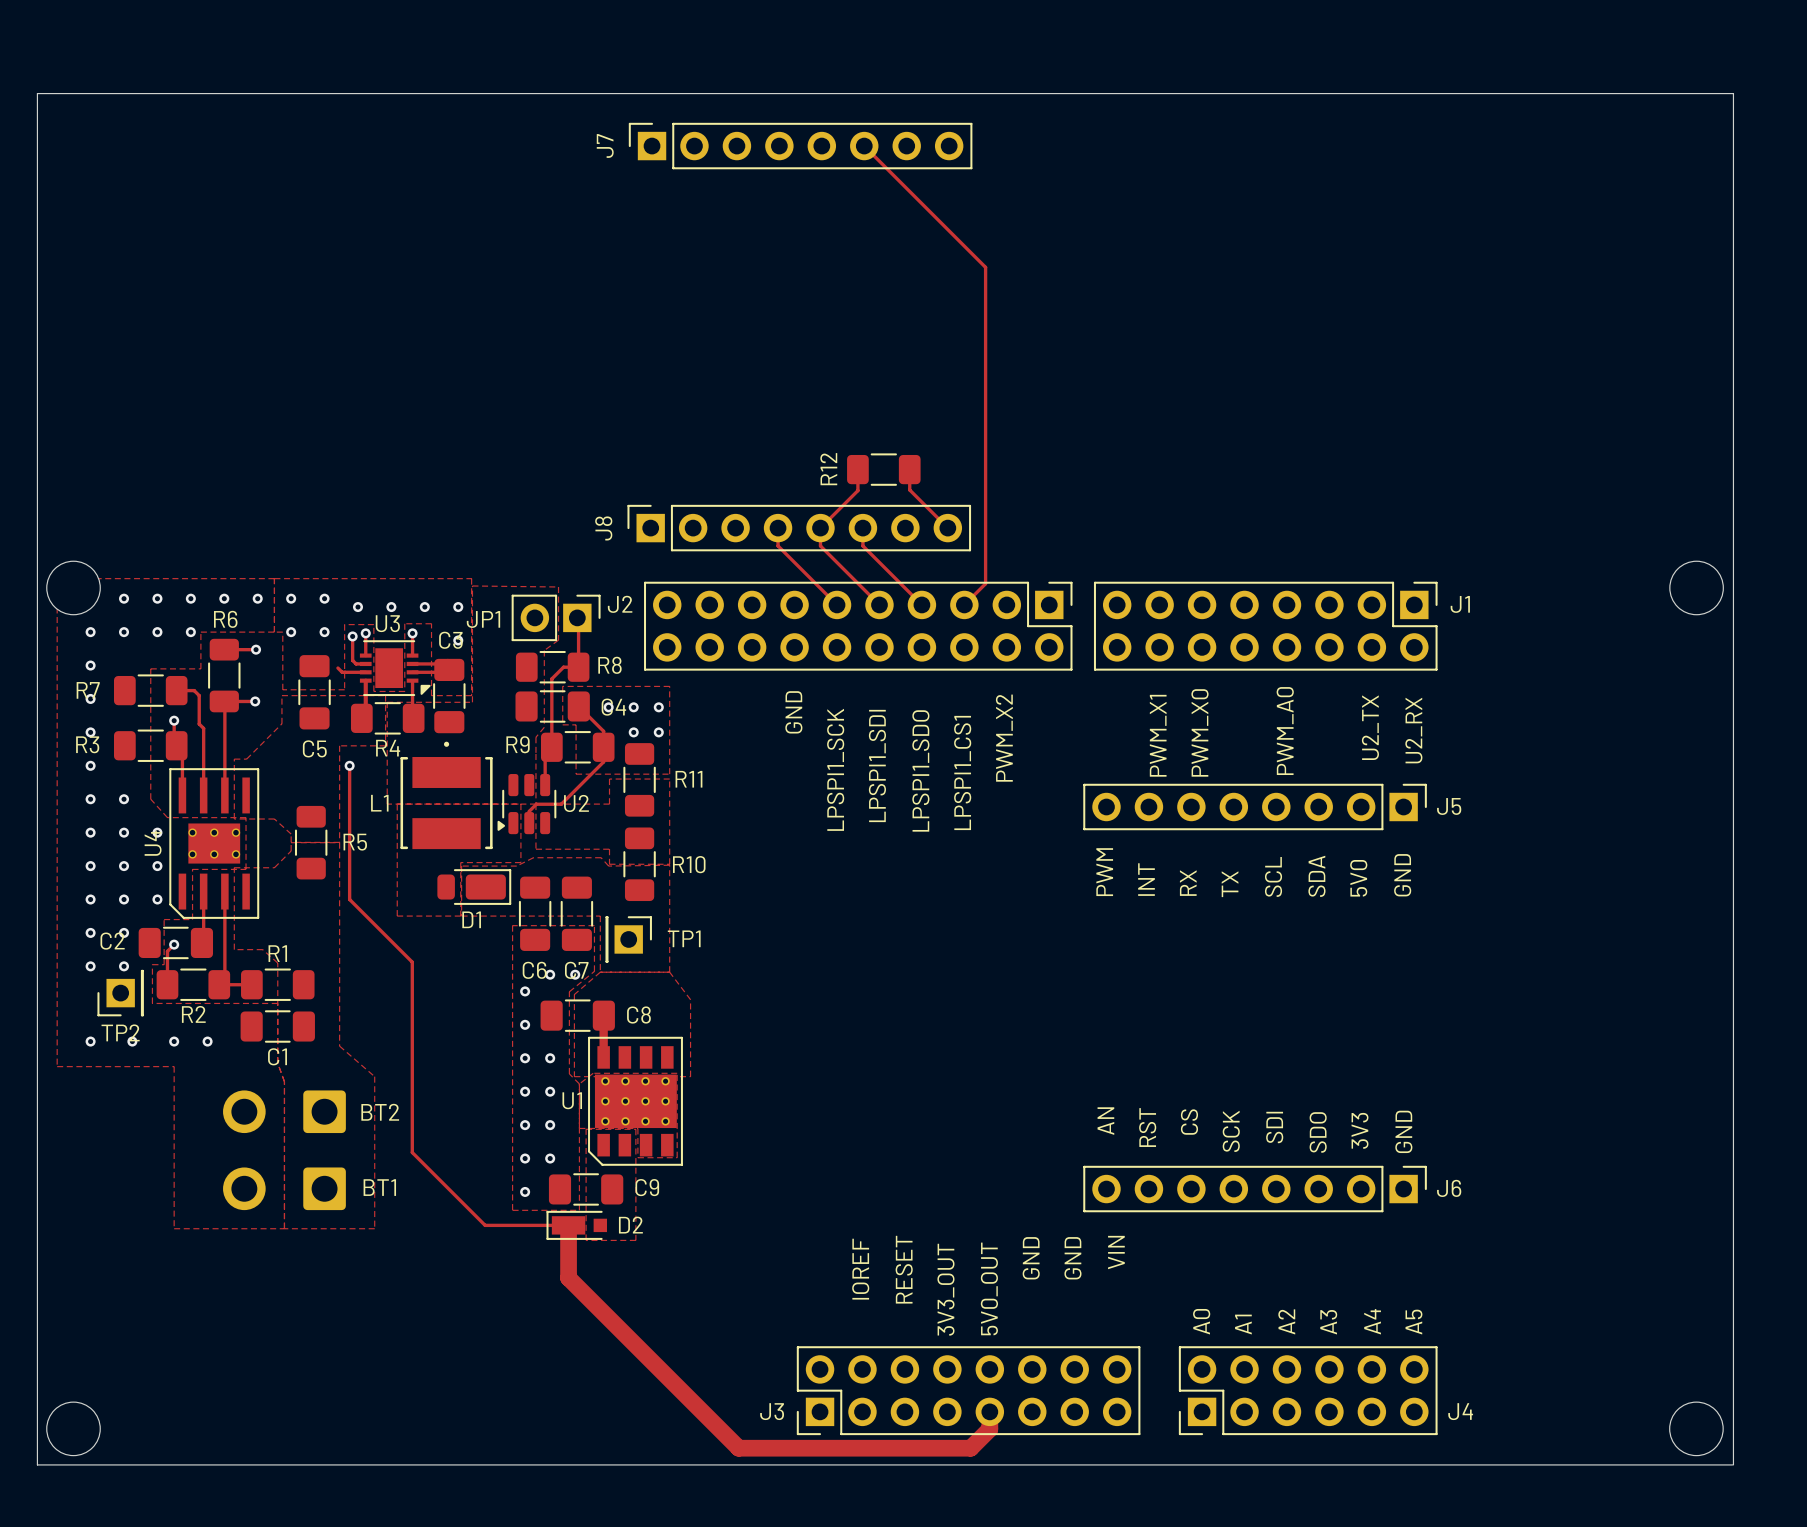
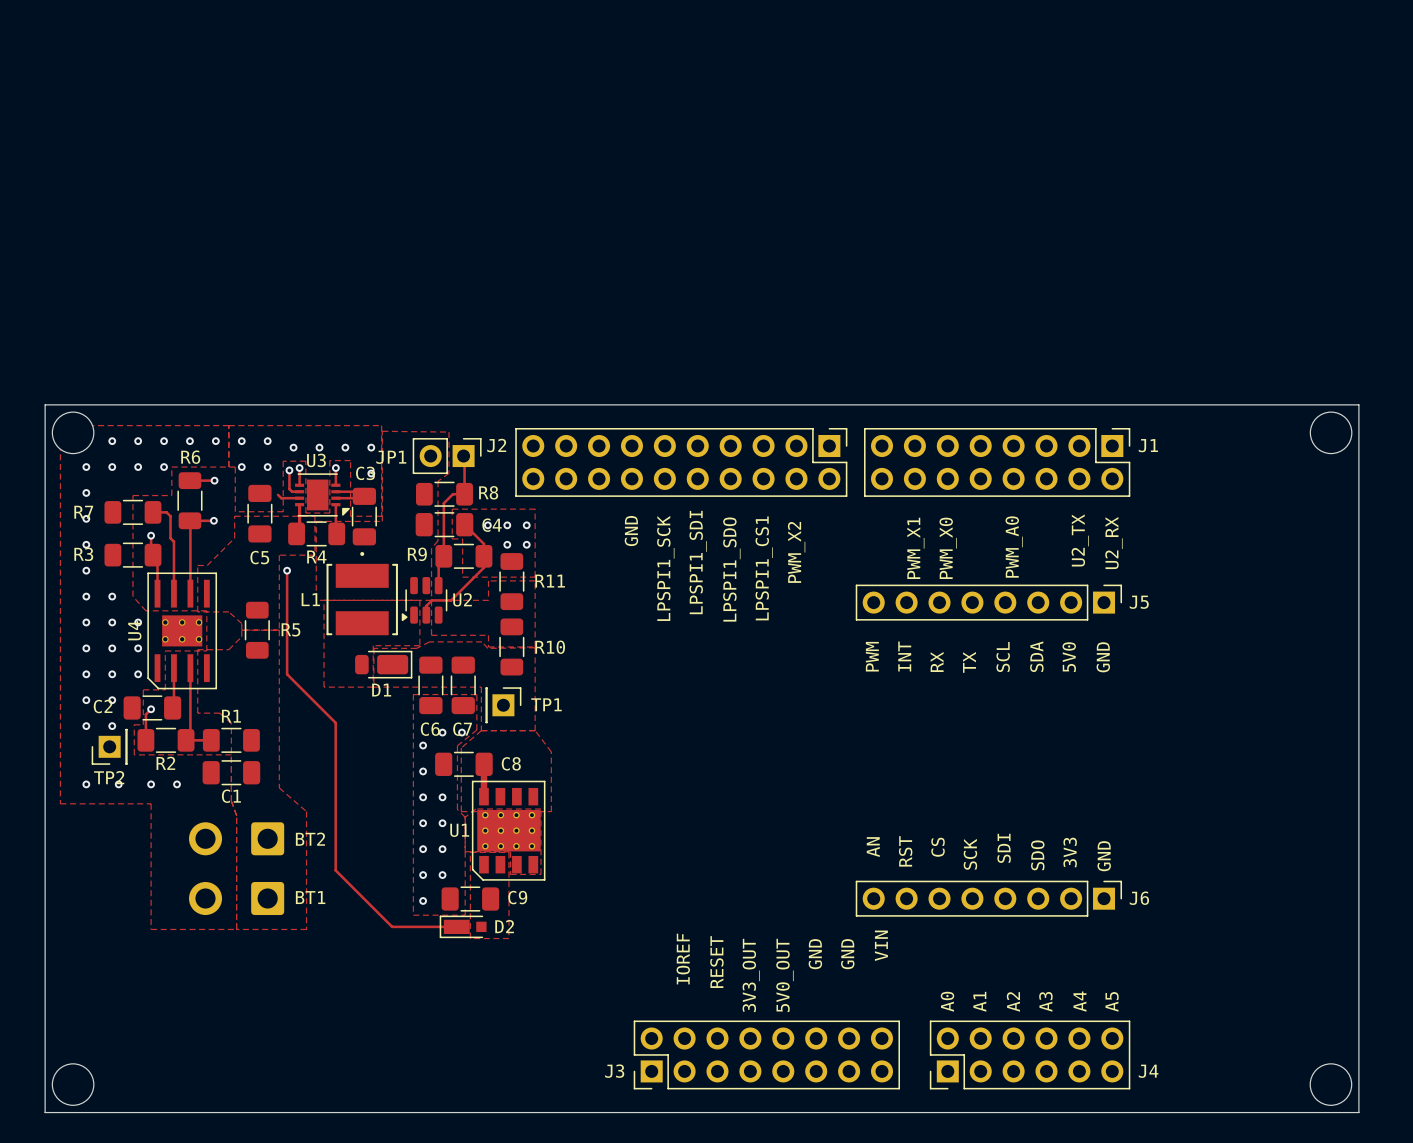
J7: (800, 146) -> none
track: (864, 146) (985, 267) (985, 583) (964, 604) -> none
track: (857, 469) (857, 490) (820, 528) (820, 545) (879, 604) -> none
R12: (883, 469) -> none
track: (909, 469) (909, 489) (947, 528) -> none
track: (778, 528) (778, 545) (837, 604) -> none
J8: (799, 528) -> none
track: (862, 528) (862, 545) (921, 604) -> none
board edge: (37, 551) (37, 93) (1733, 93) (1733, 1464) -> (45, 404) (1358, 404) (1358, 1112)
track: (568, 1225) (568, 1278) (738, 1448) (970, 1448) (989, 1429) (989, 1411) -> none

